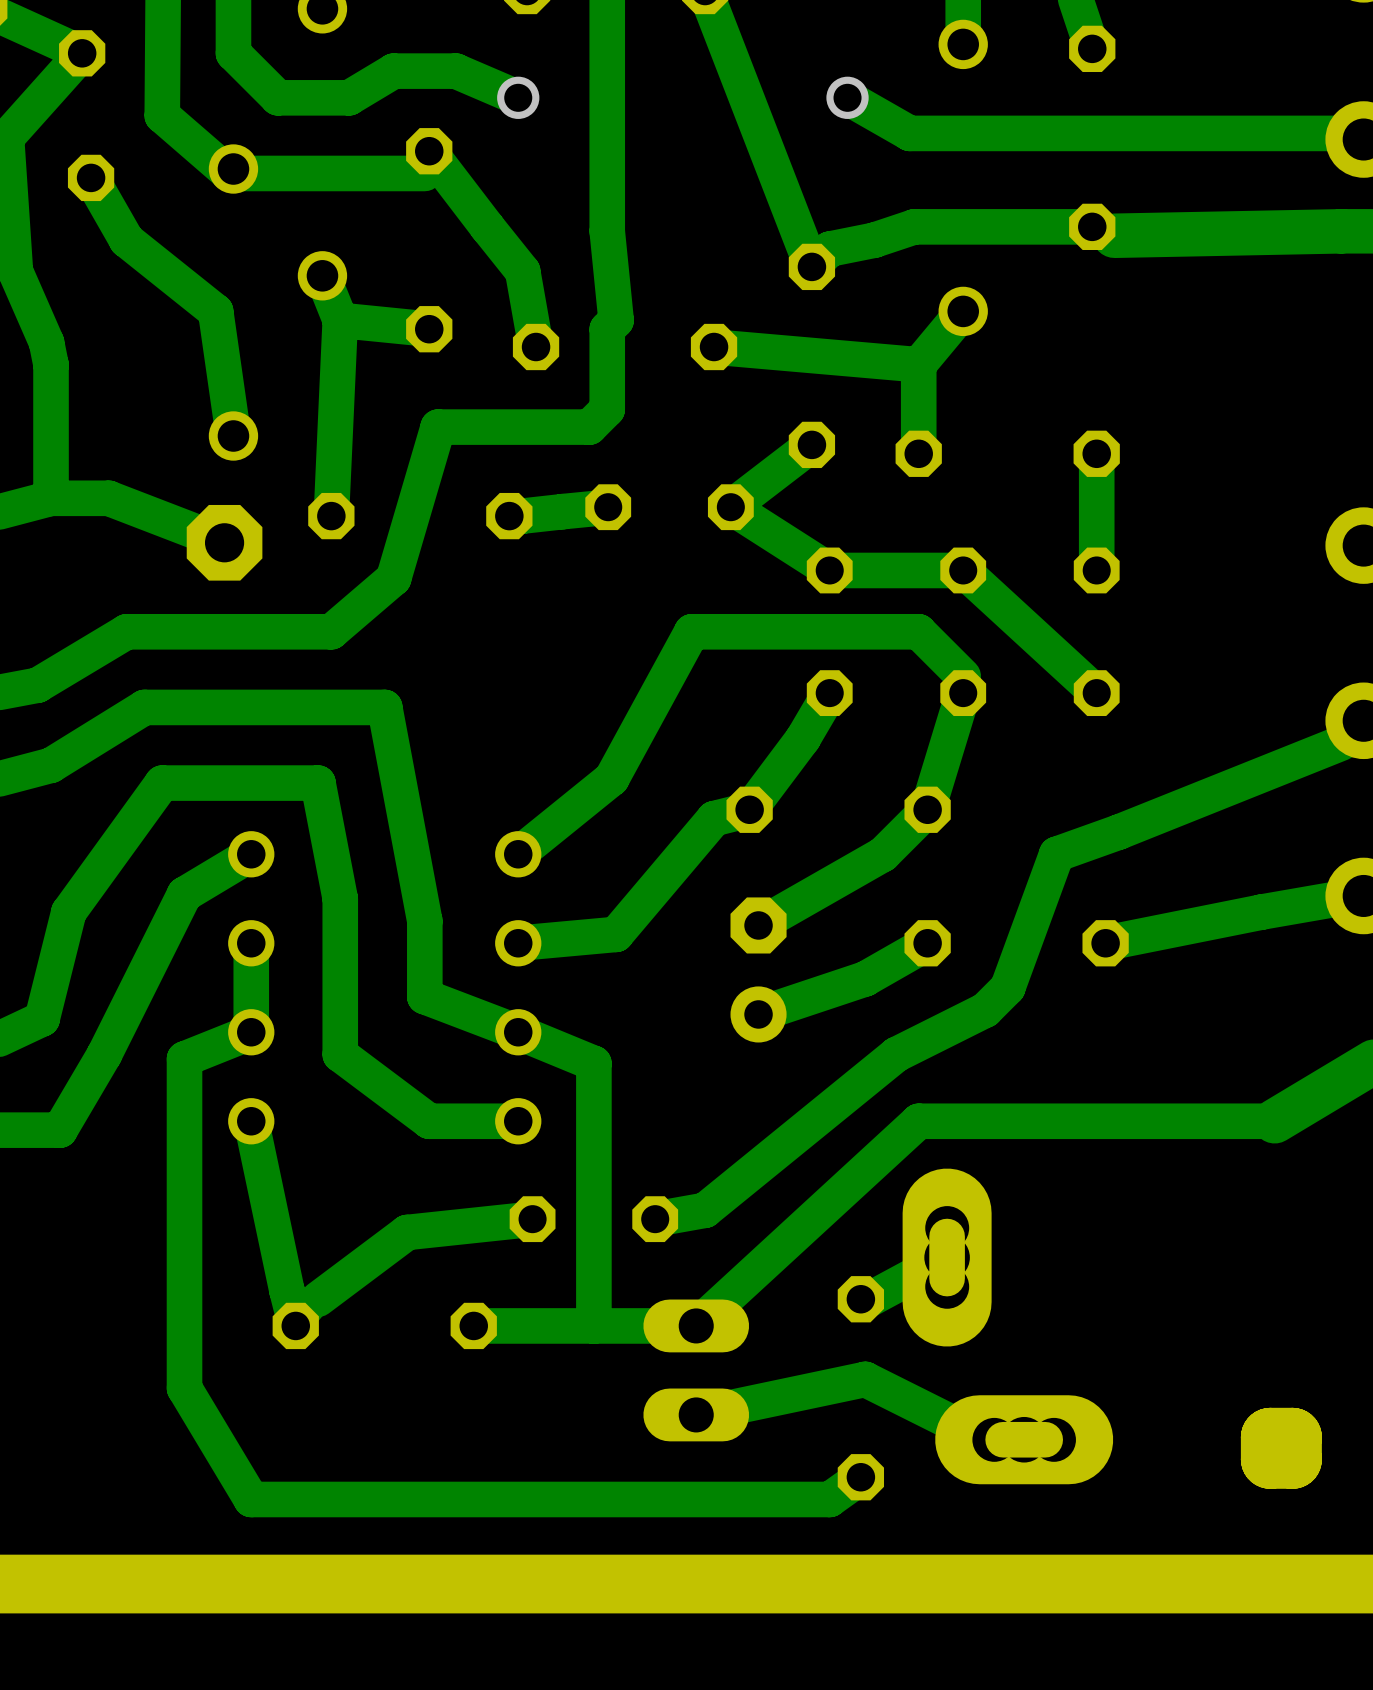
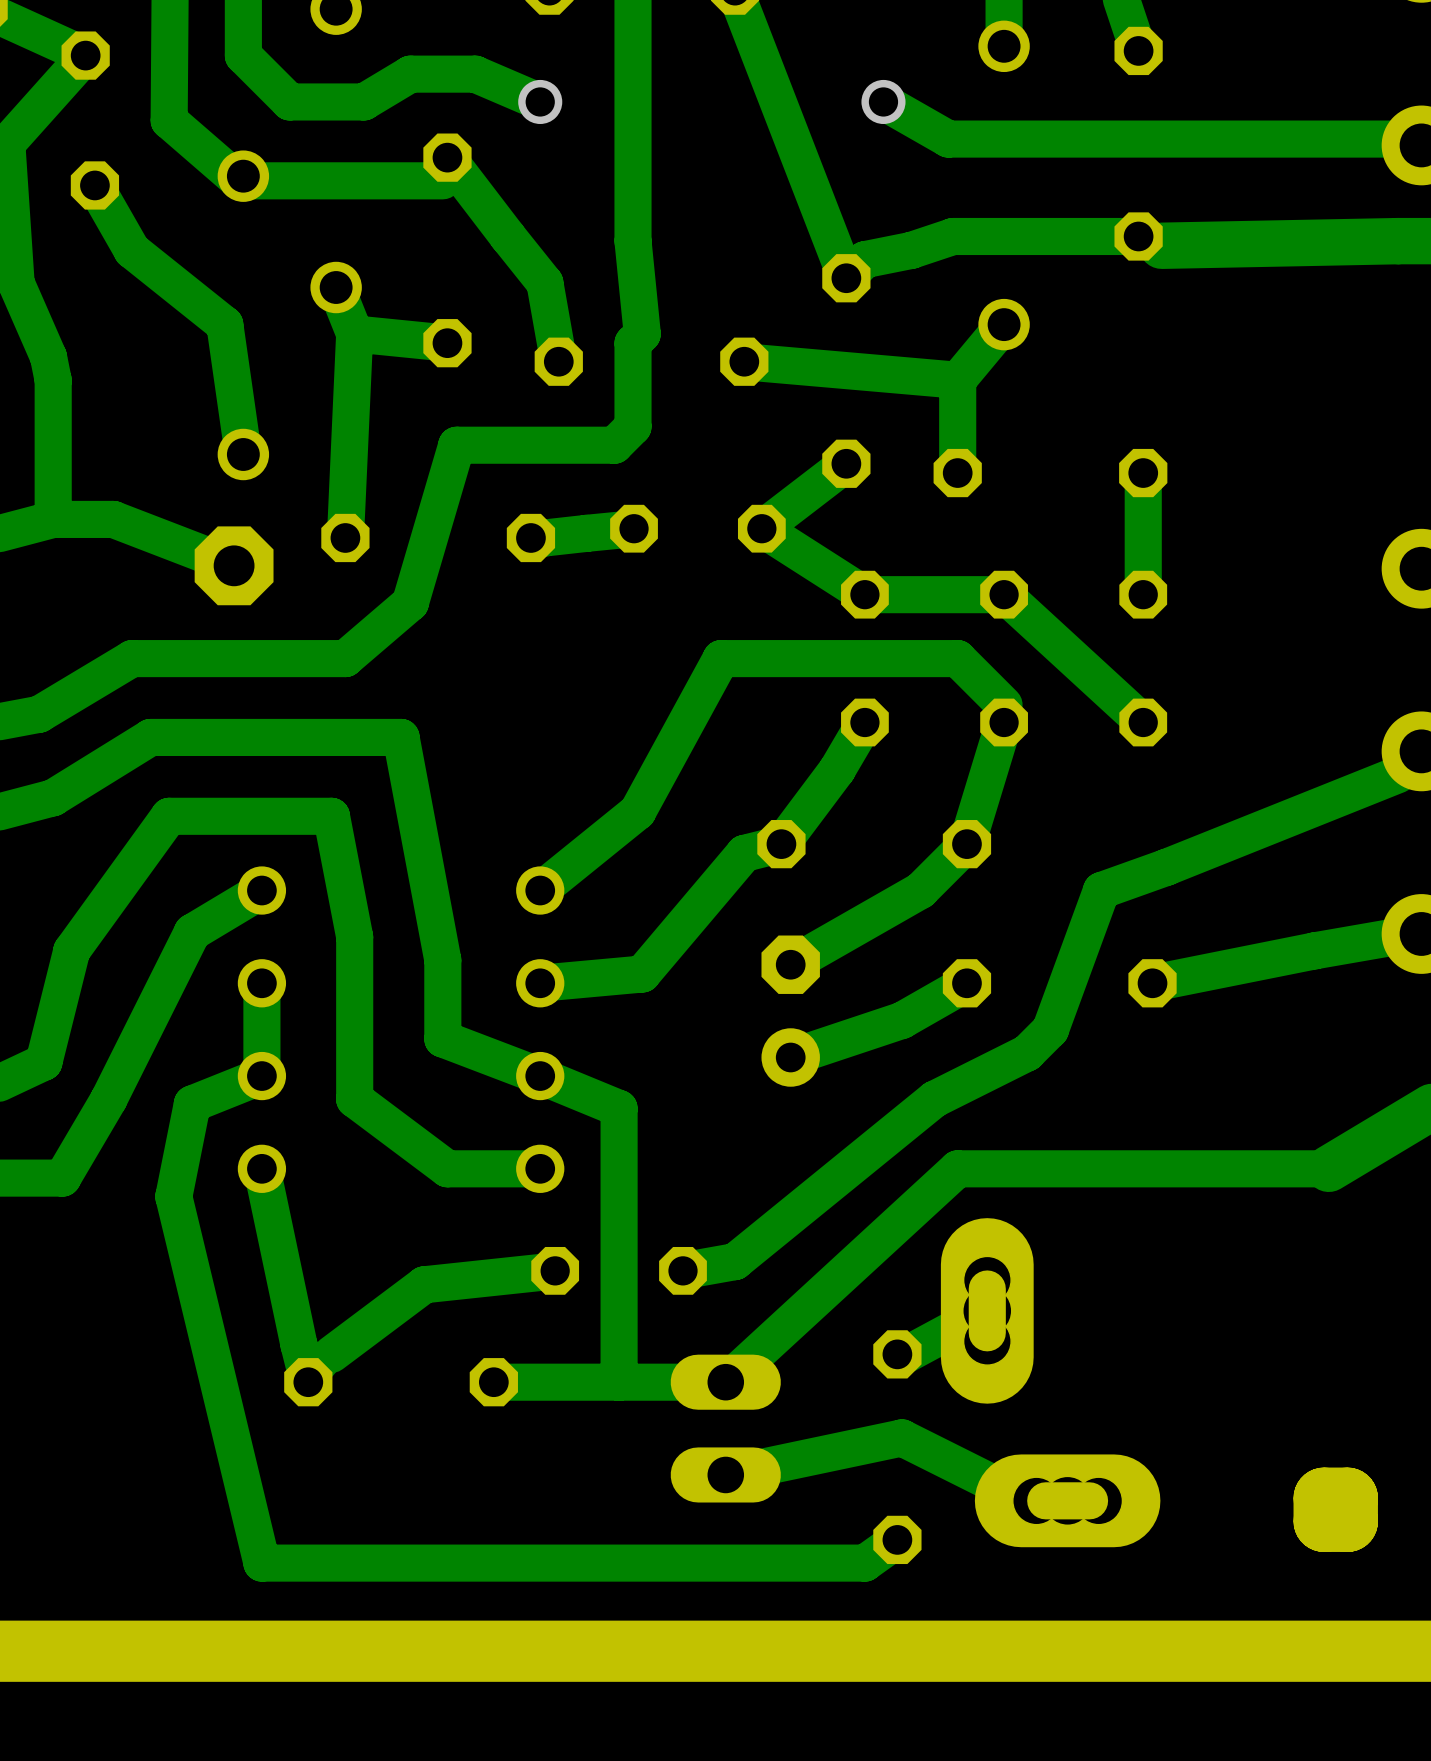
track: (184, 1058) (184, 1388) (251, 1499) -> (192, 1103) (173, 1196) (261, 1563)

